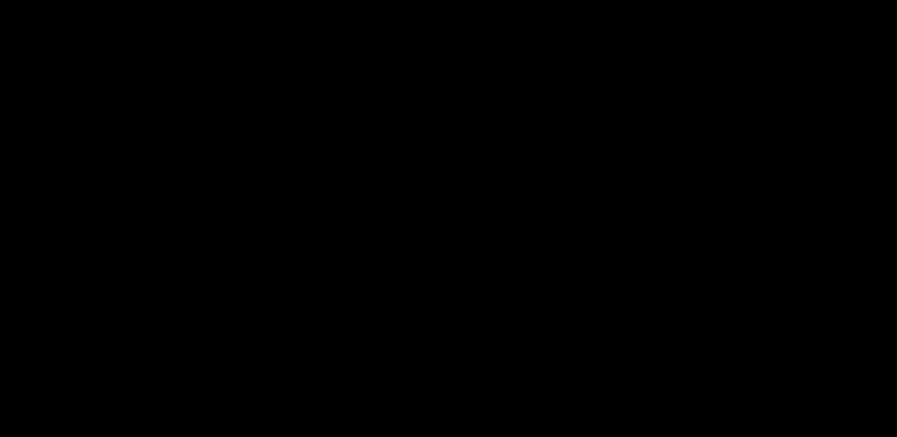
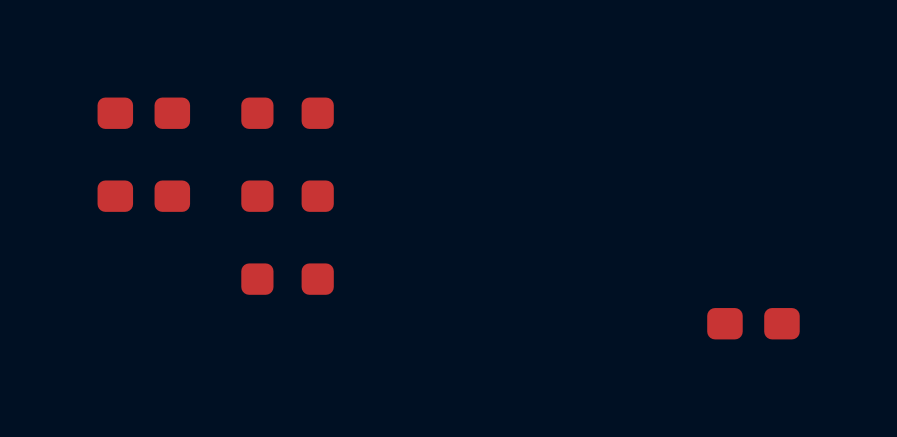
part: none -> (143, 113)
part: none -> (287, 113)
part: none -> (143, 196)
part: none -> (287, 196)
part: none -> (287, 279)
part: none -> (753, 323)

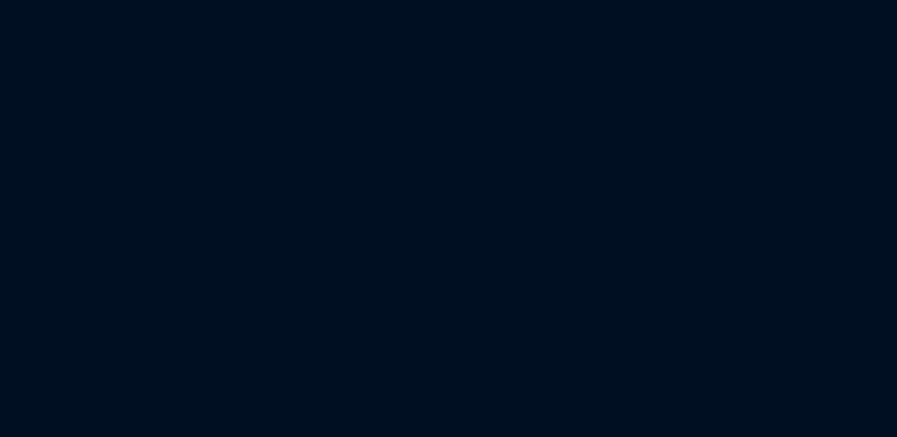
part: (143, 113) -> none
part: (287, 113) -> none
part: (143, 196) -> none
part: (287, 196) -> none
part: (287, 279) -> none
part: (753, 323) -> none

